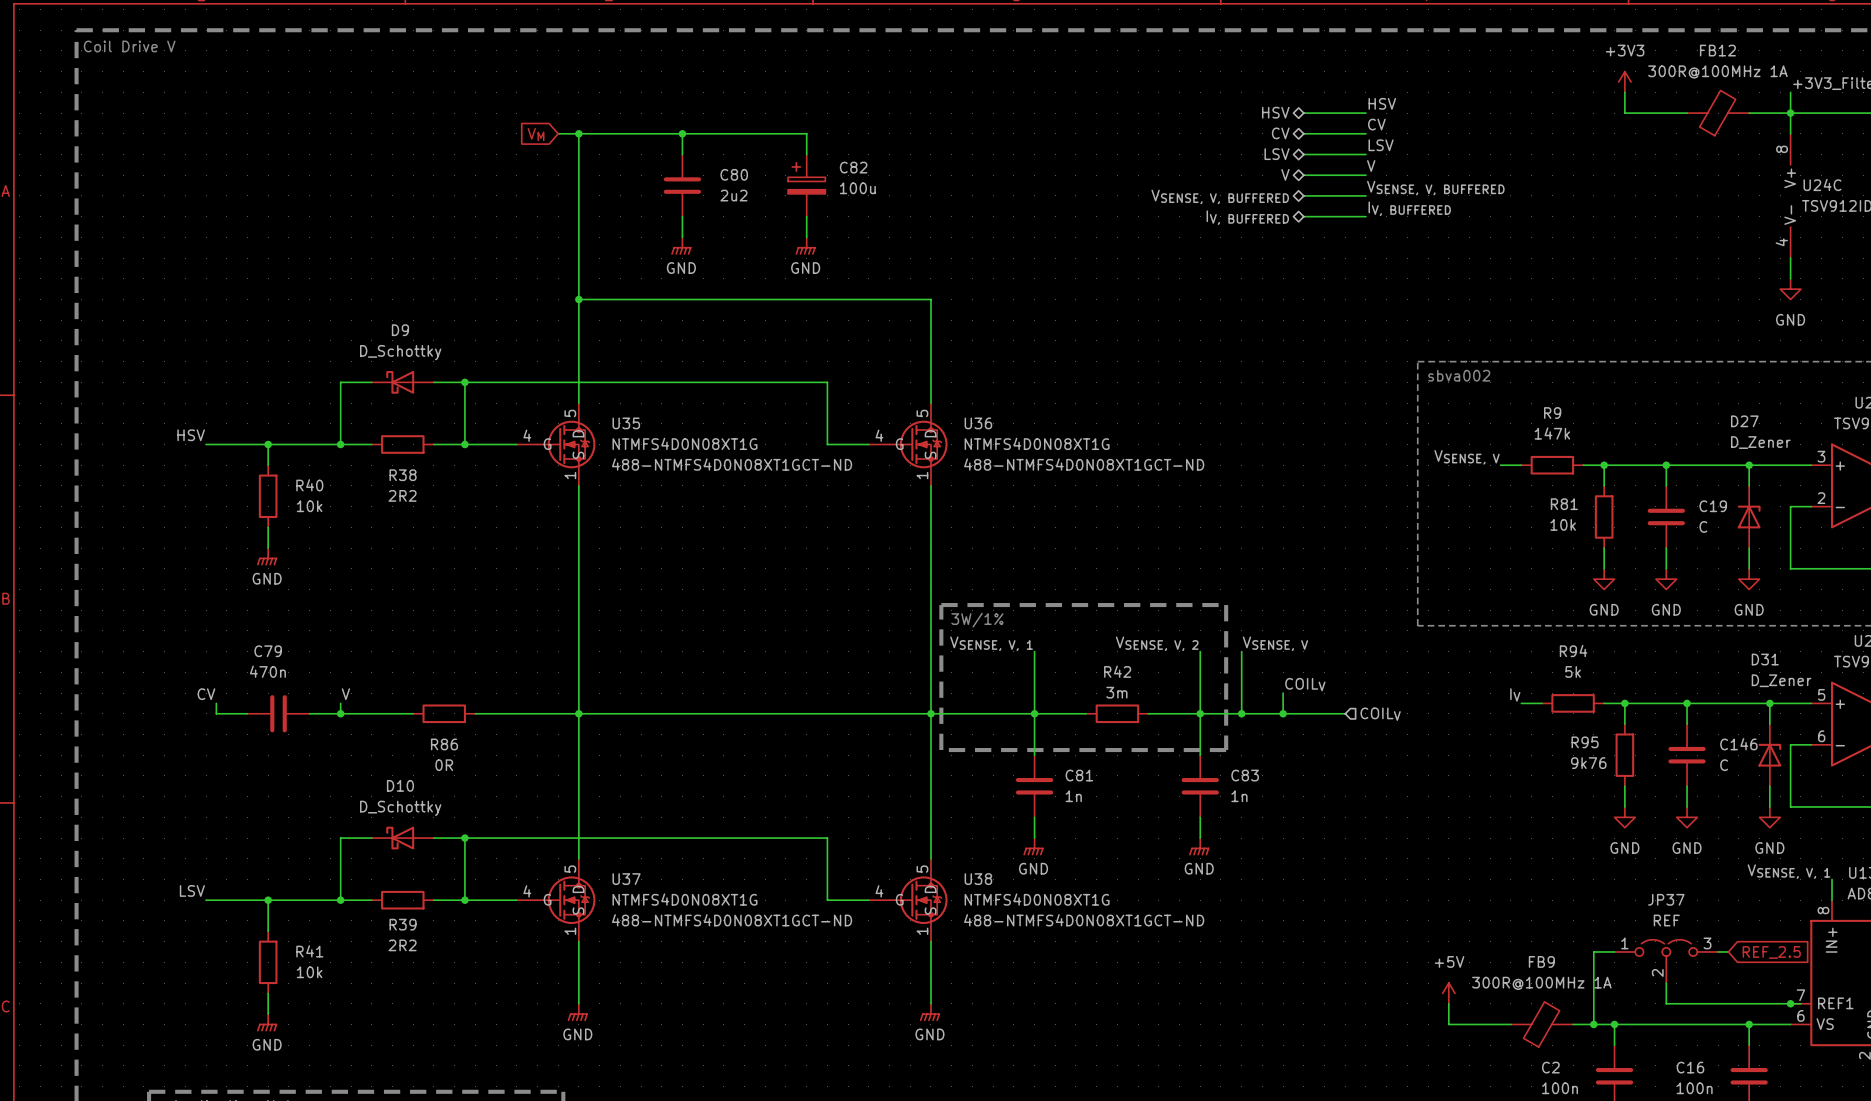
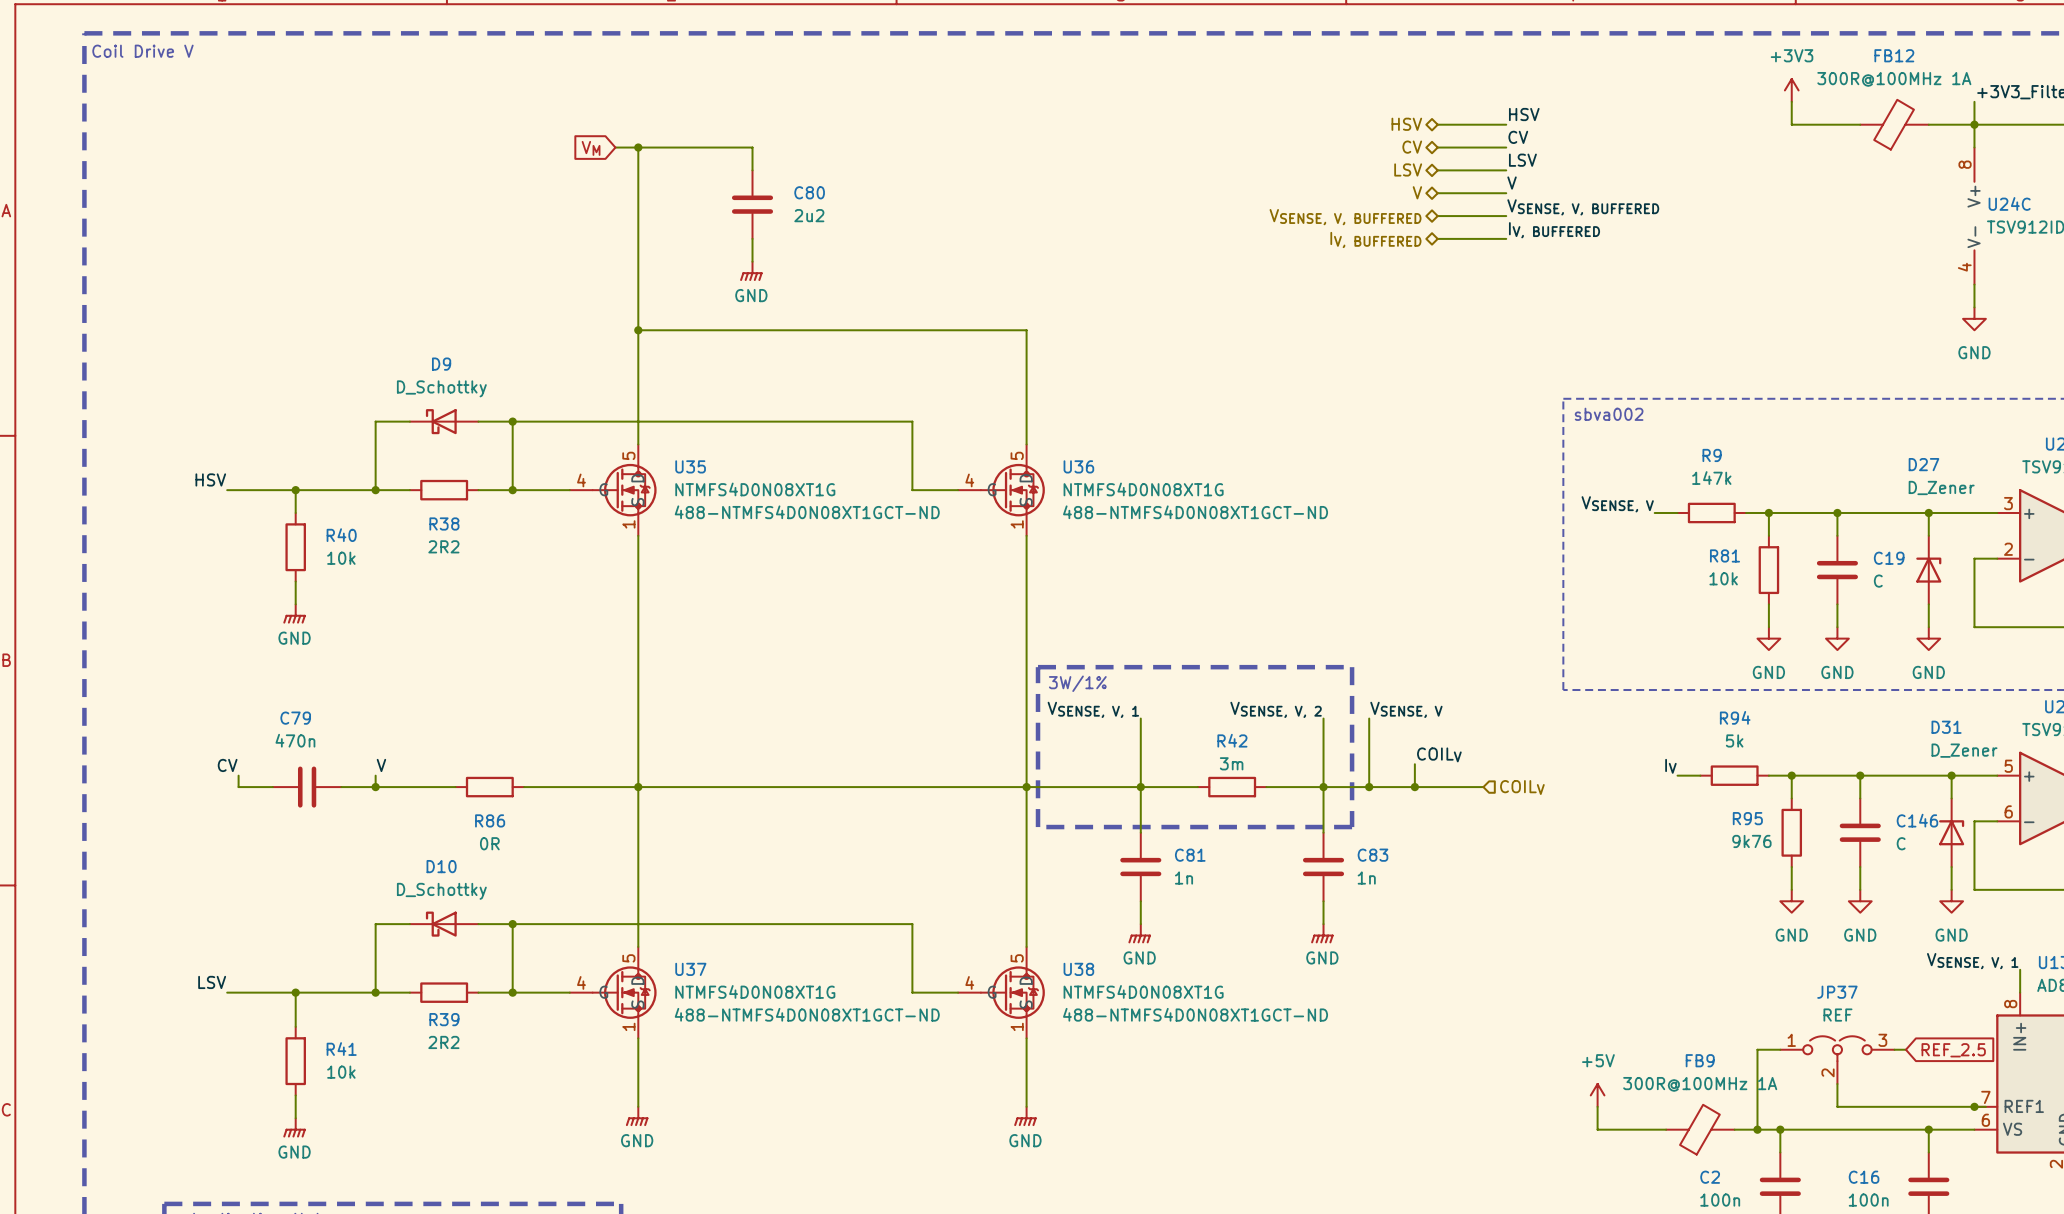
wire: (682, 133) (806, 133) (806, 154) -> none
junction: (682, 133) -> none
C82: 100u (806, 185) -> none
wire: (806, 216) (806, 237) -> none
power symbol: GND (805, 246) -> none

